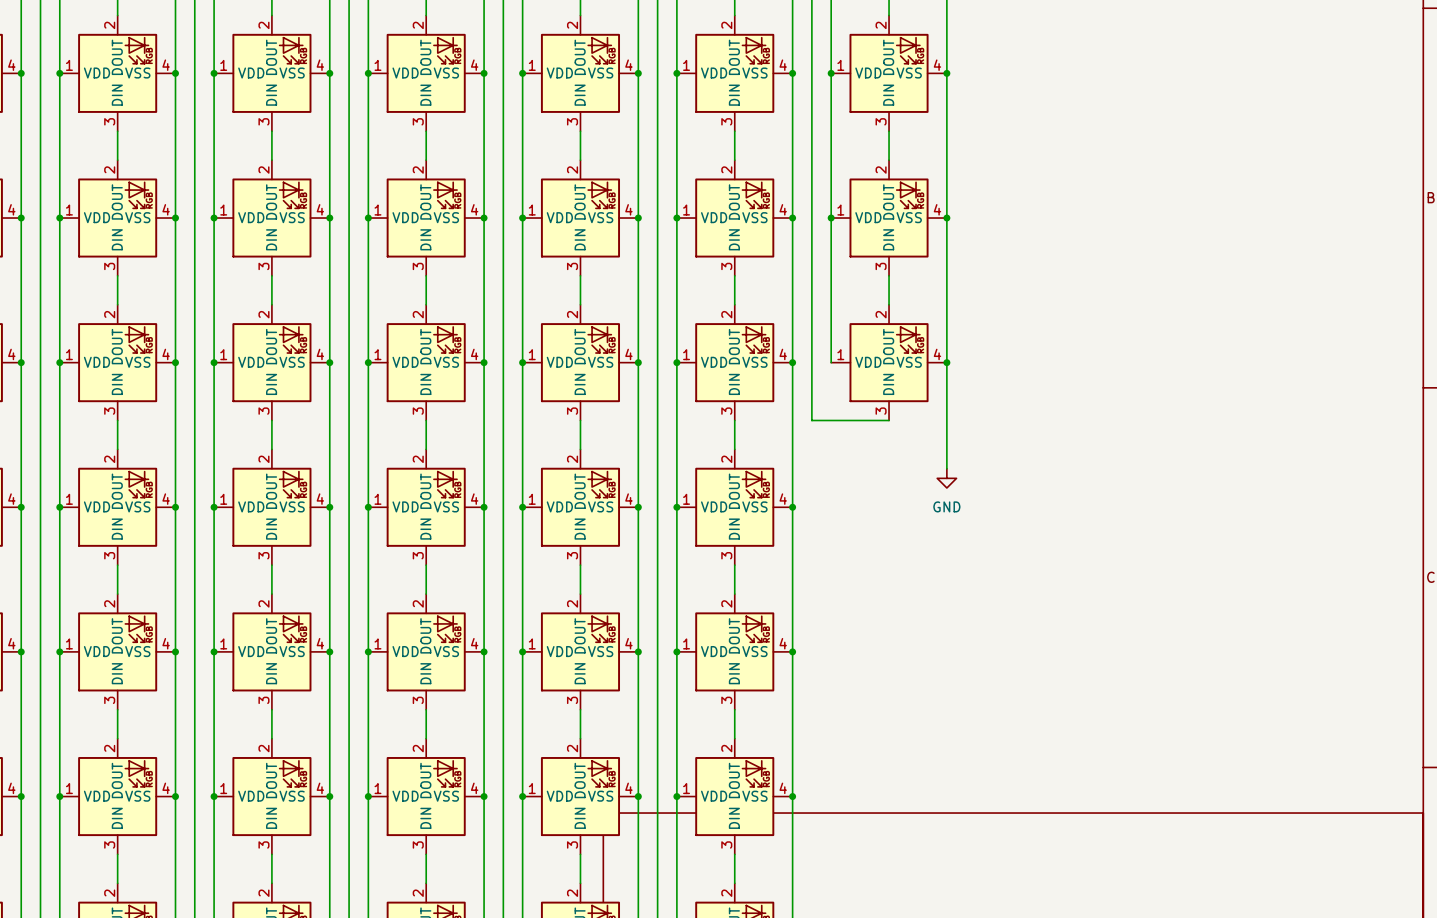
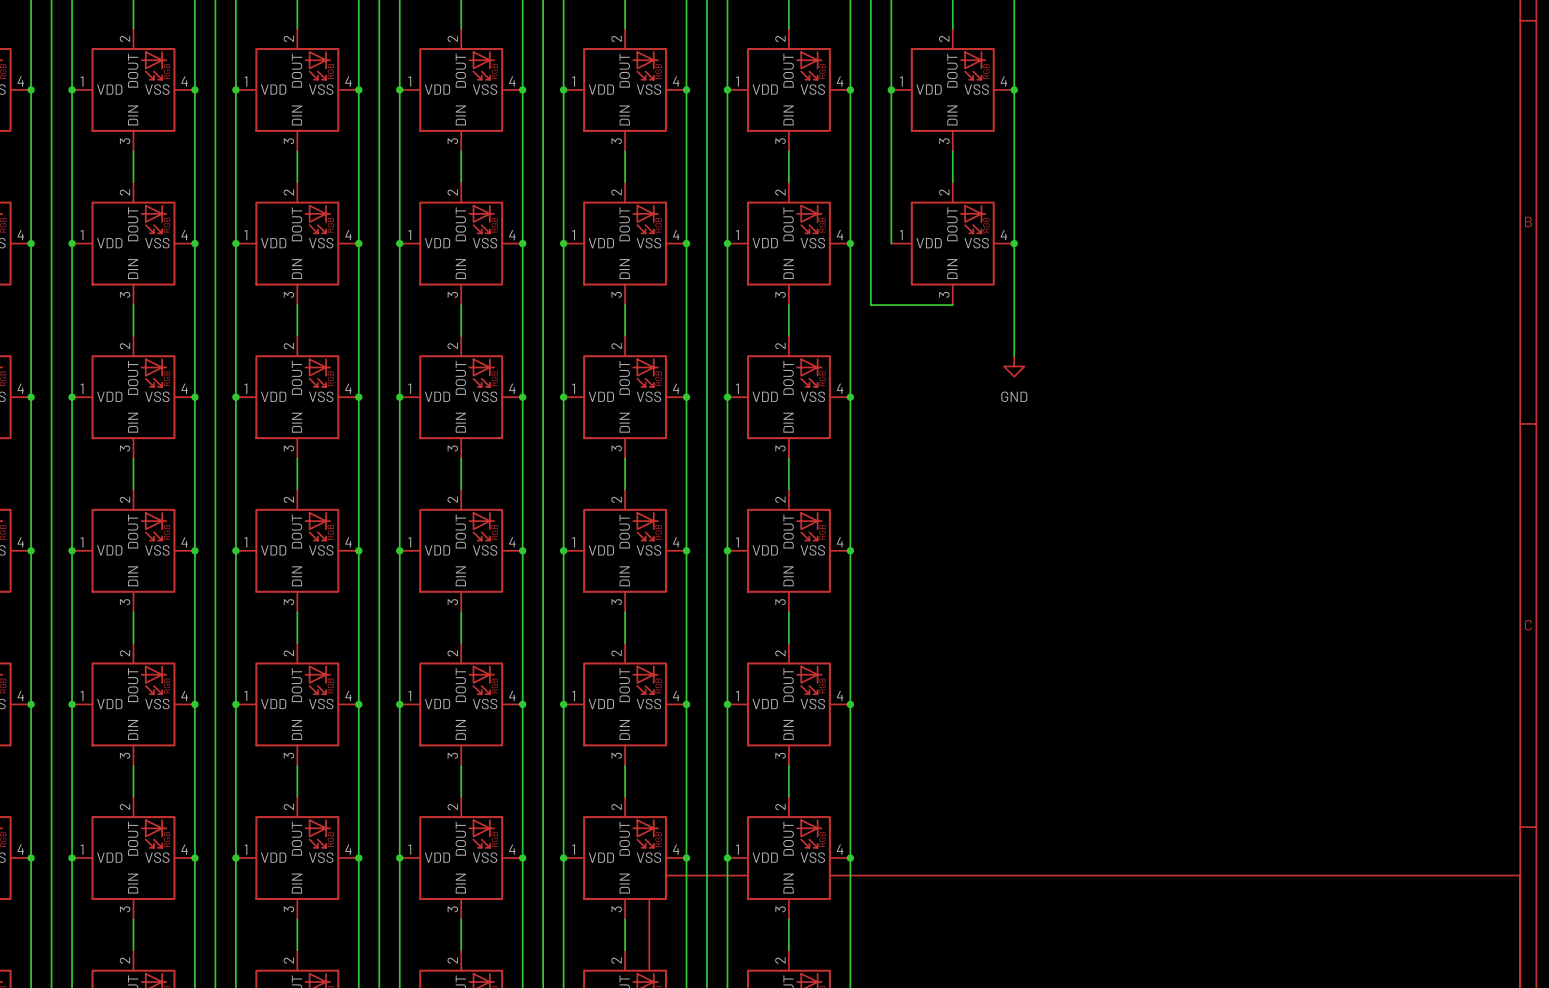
wire: (831, 218) (831, 362) -> none
junction: (831, 218) -> none
wire: (811, 275) (811, 420) (889, 420) -> none
wire: (889, 275) (889, 304) -> (952, 305) (870, 305)
wire: (946, 324) (946, 468) -> none
part: (889, 362) -> none
junction: (946, 362) -> none
power symbol position: GND (946, 478) -> GND (1014, 366)

